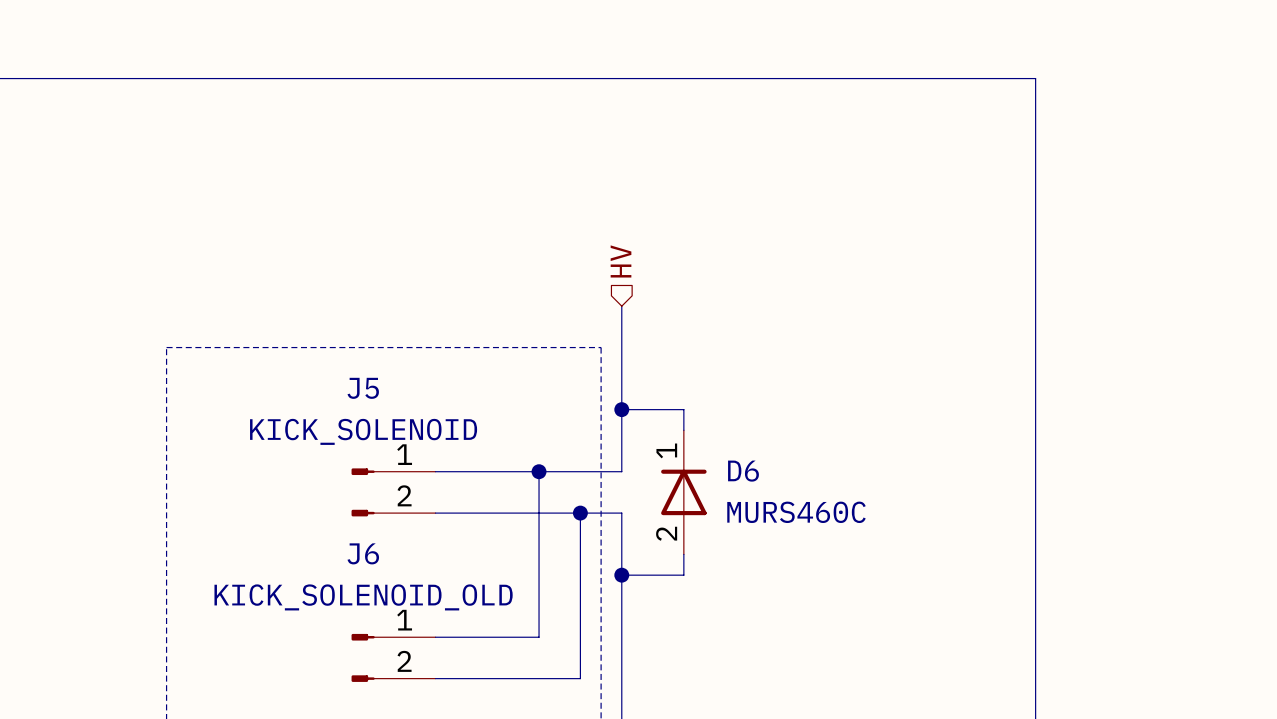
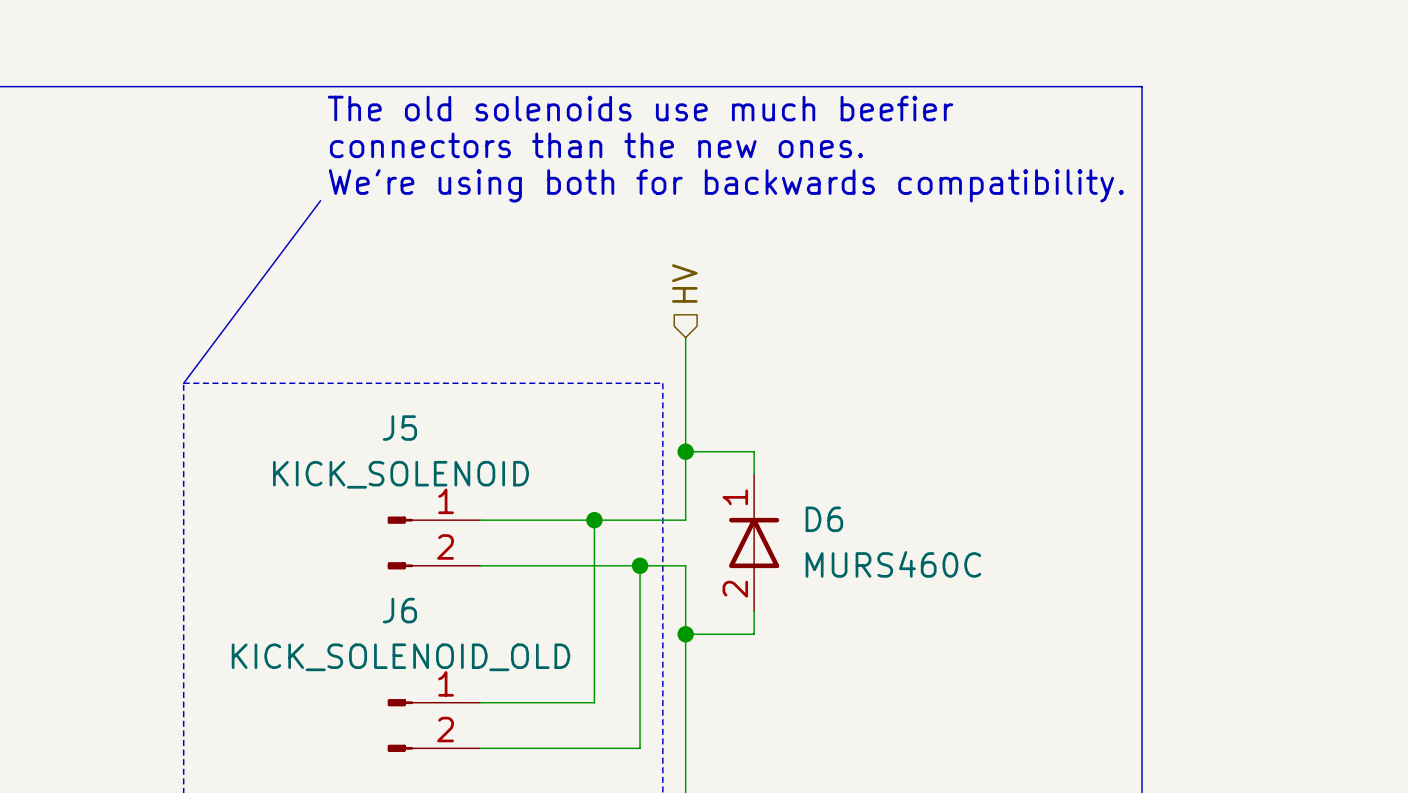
text: none -> The old solenoids use much beefier (640, 108)
text: none -> connectors than the new ones. (596, 145)
text: none -> We're using both for backwards compatibility. (726, 185)
line: none -> (320, 200) (183, 383)

